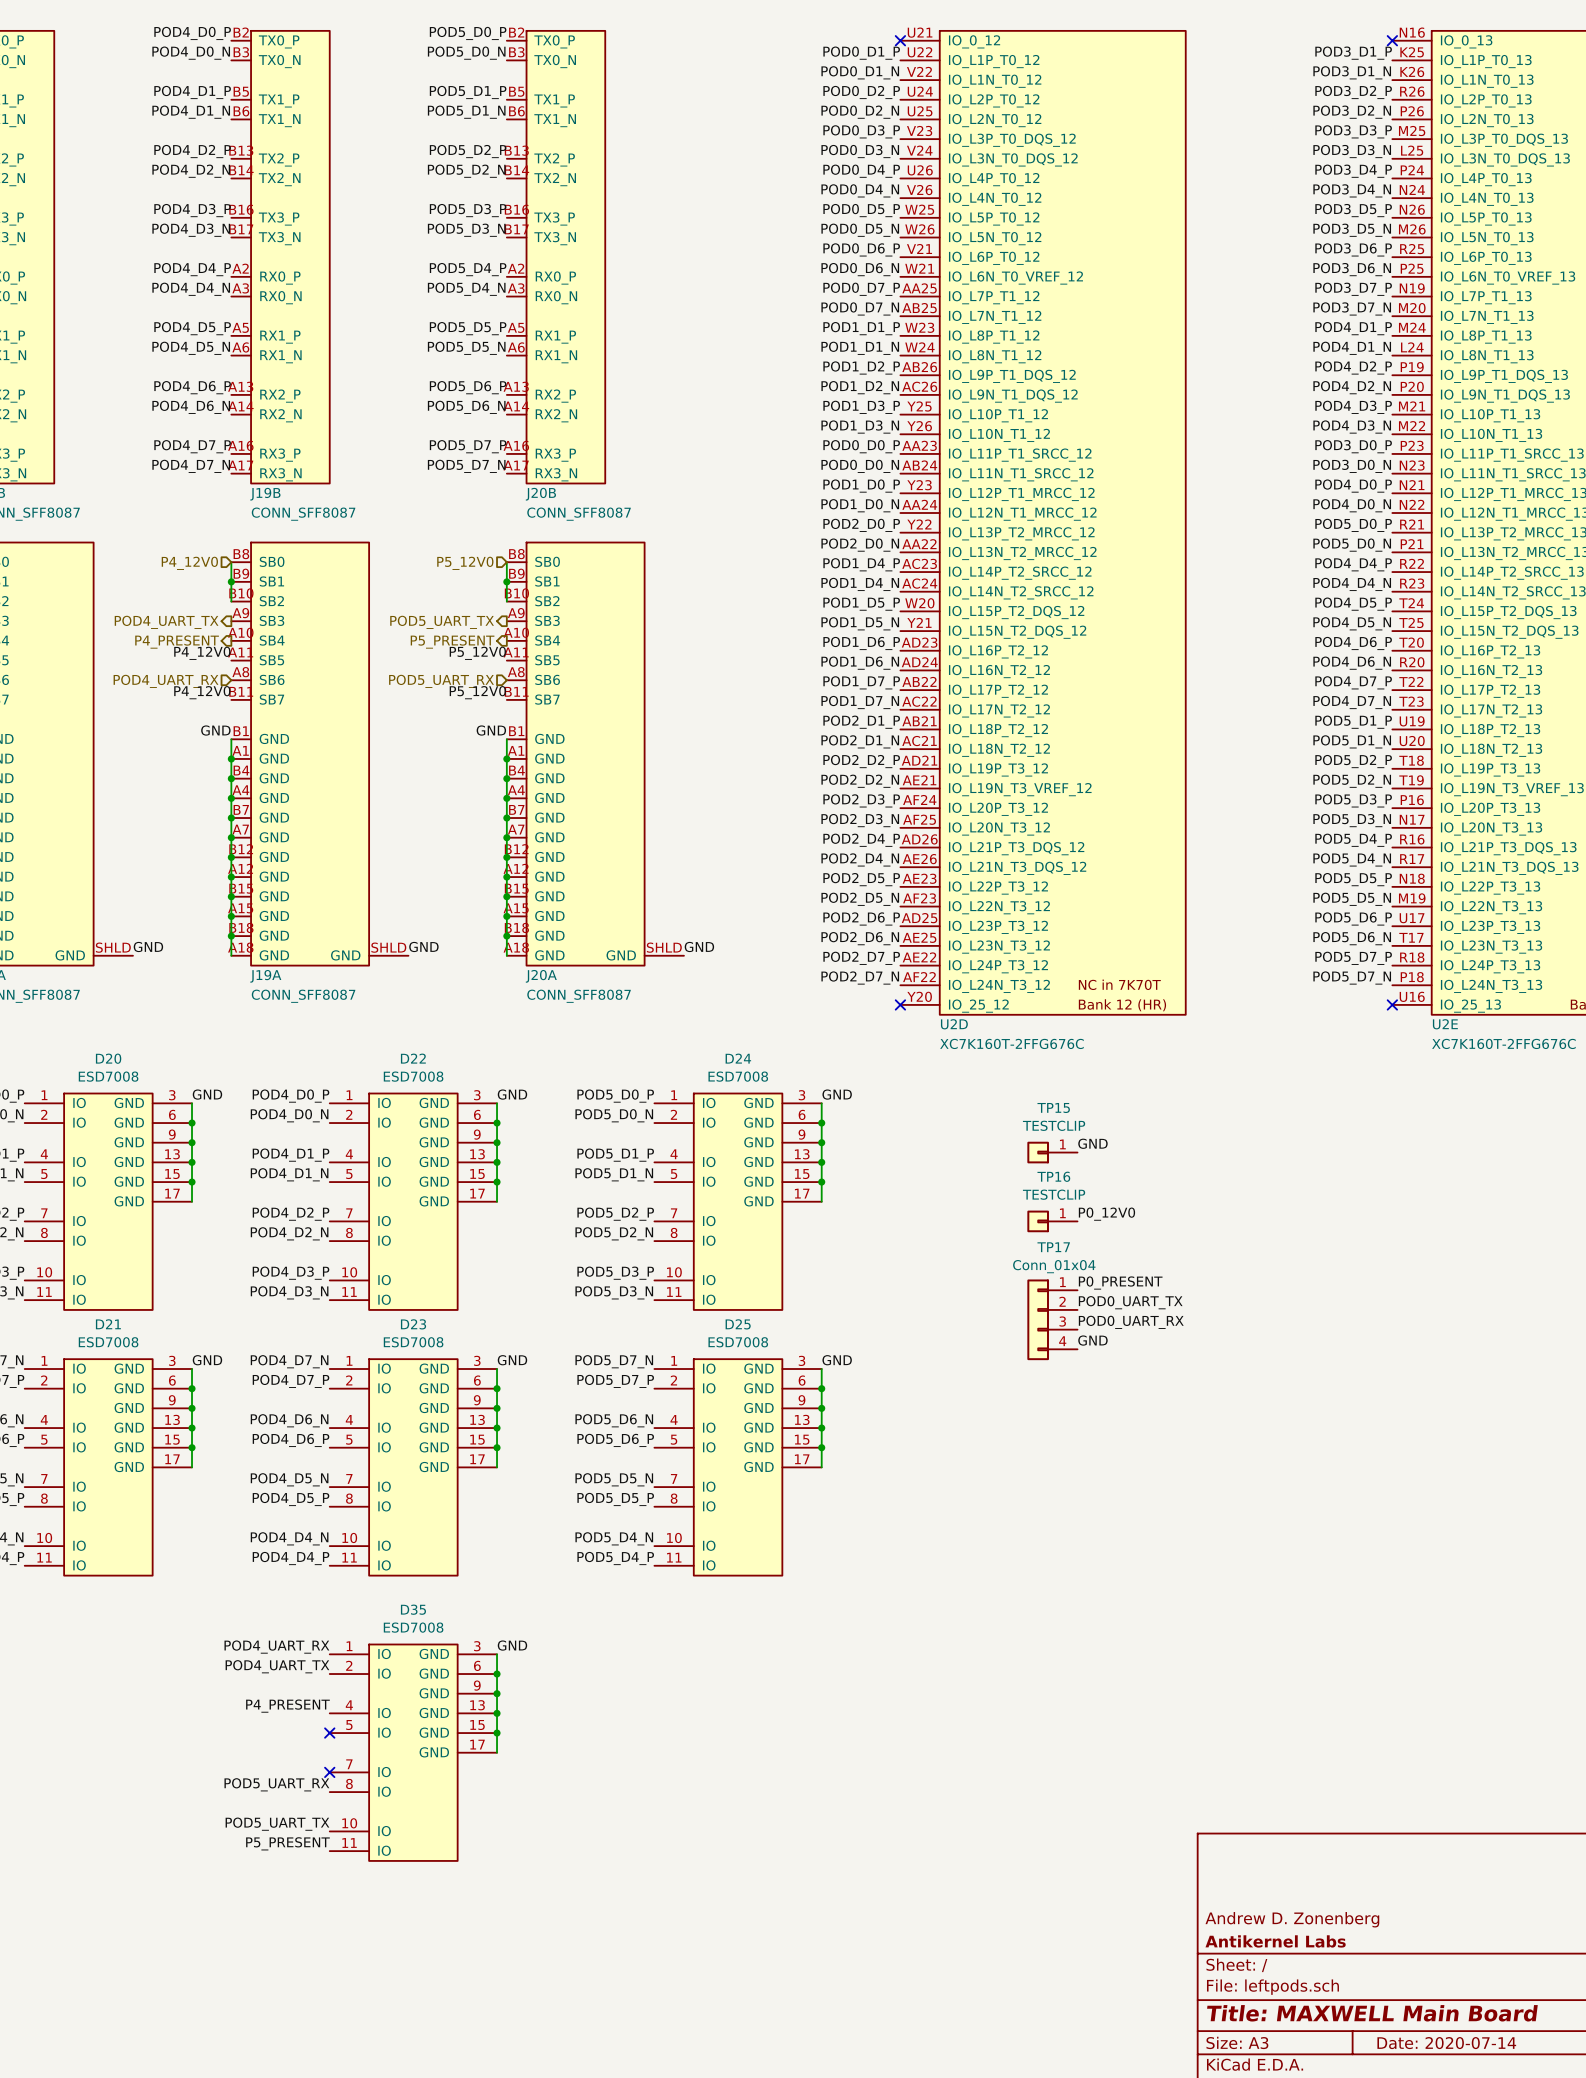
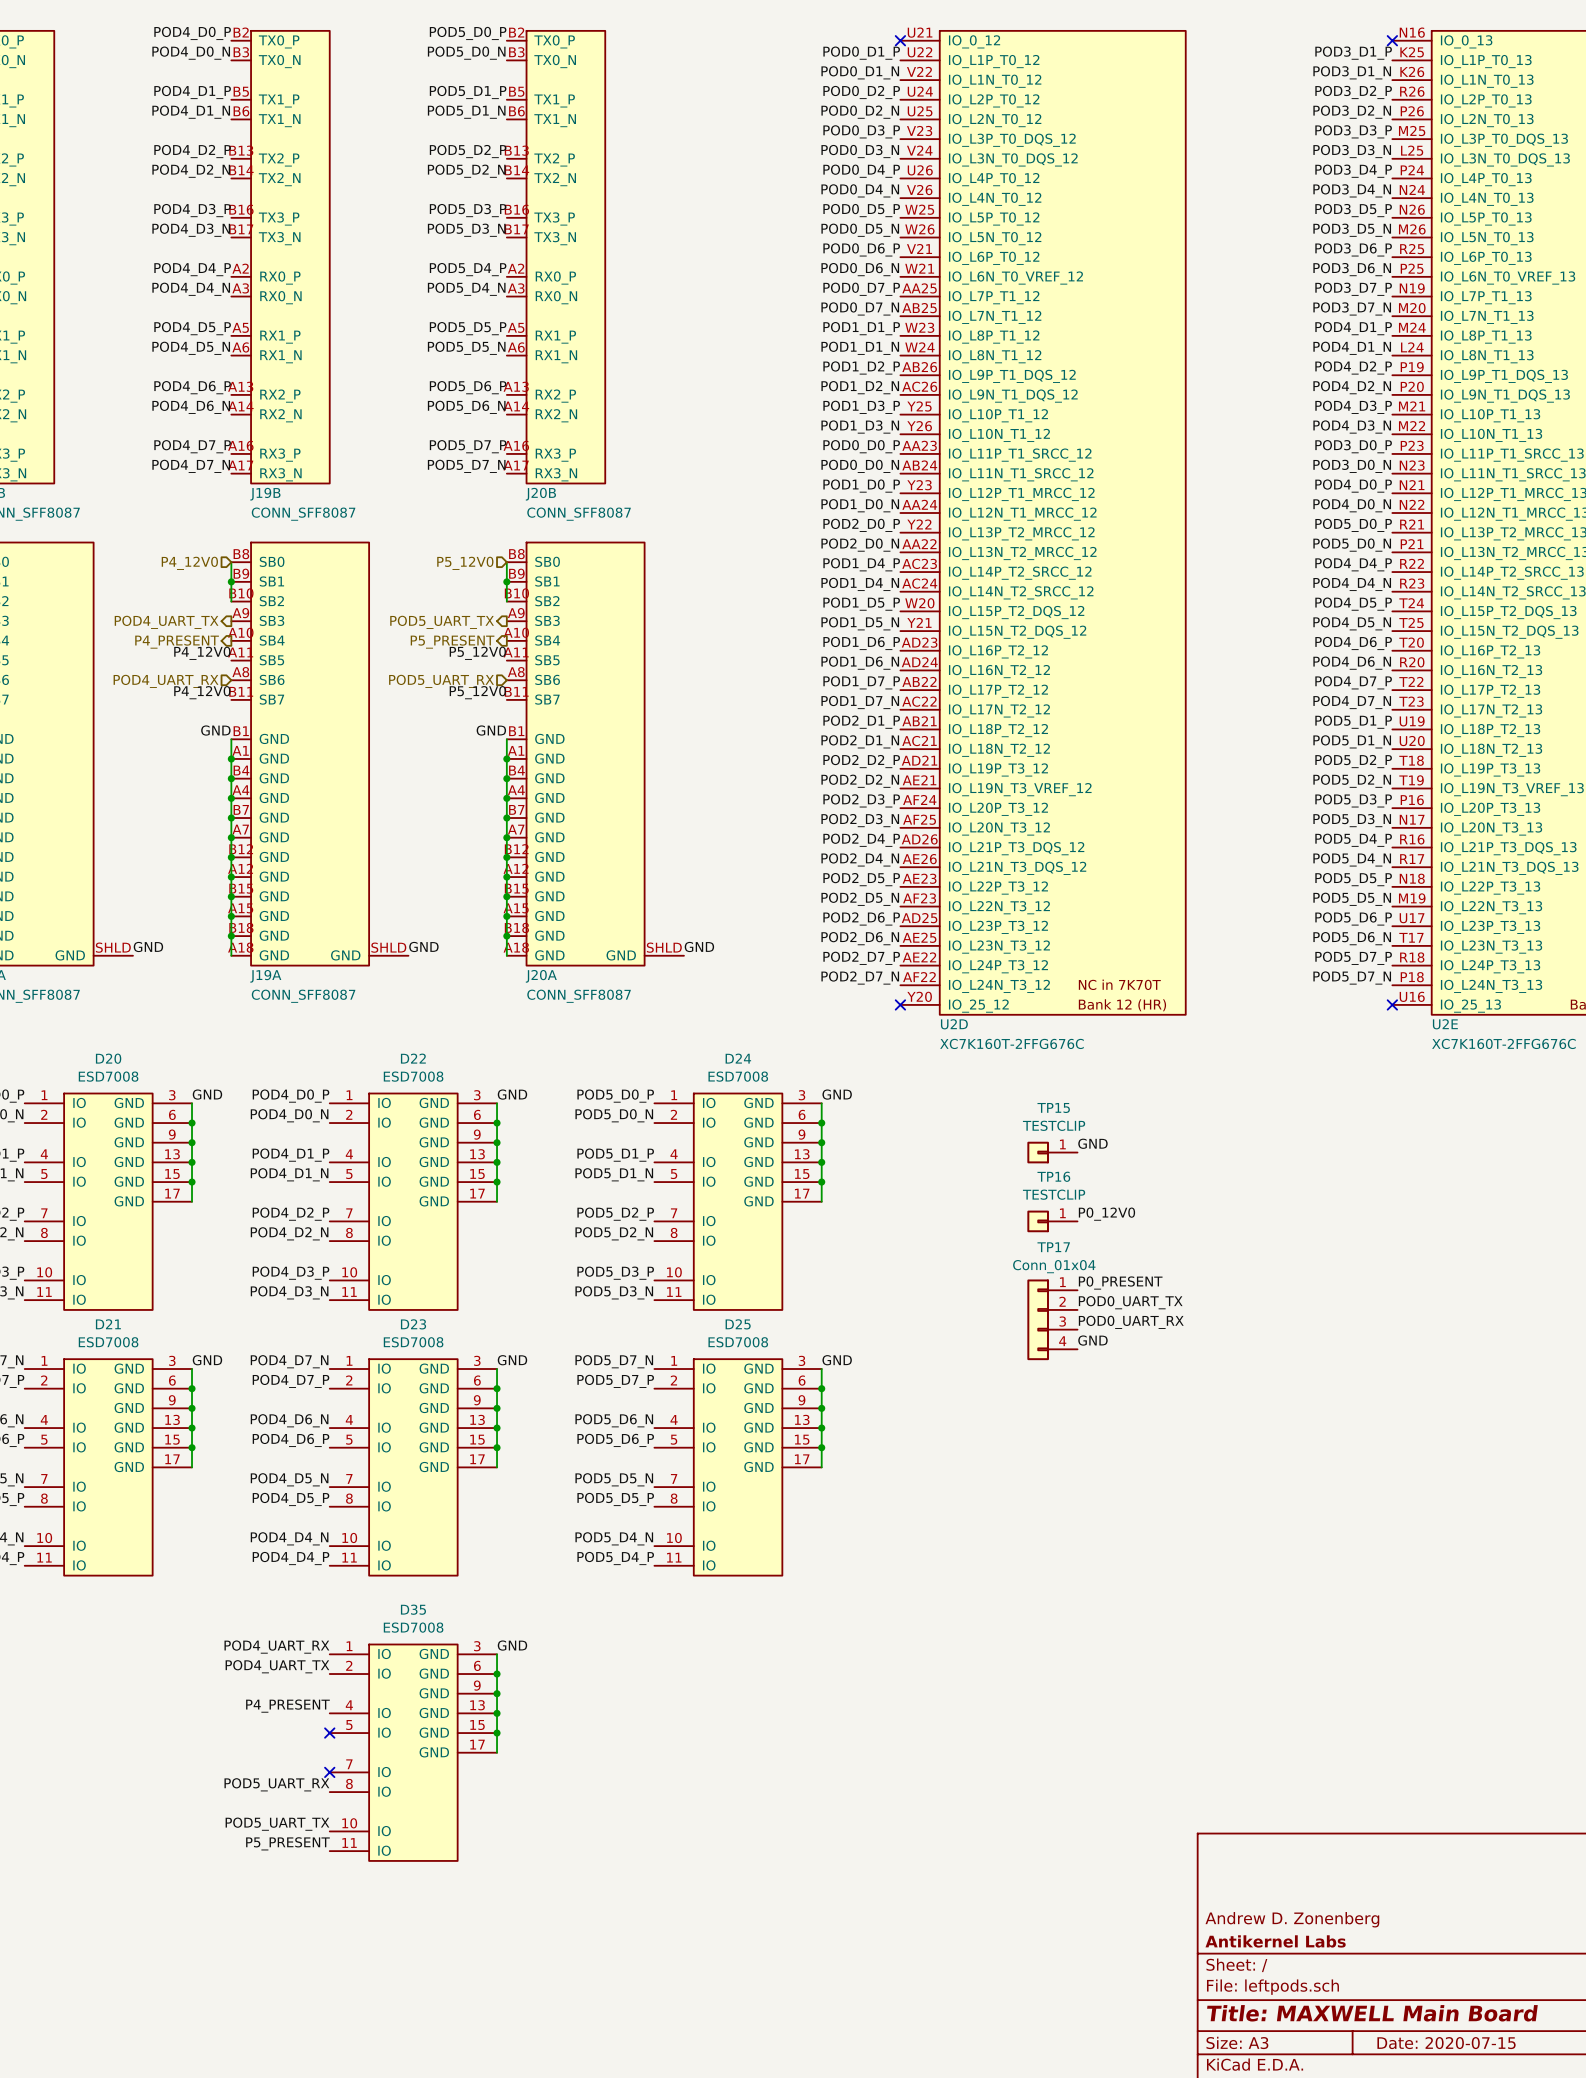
title block: Date: 2020-07-14 (1446, 2043) -> Date: 2020-07-15 (1446, 2043)

